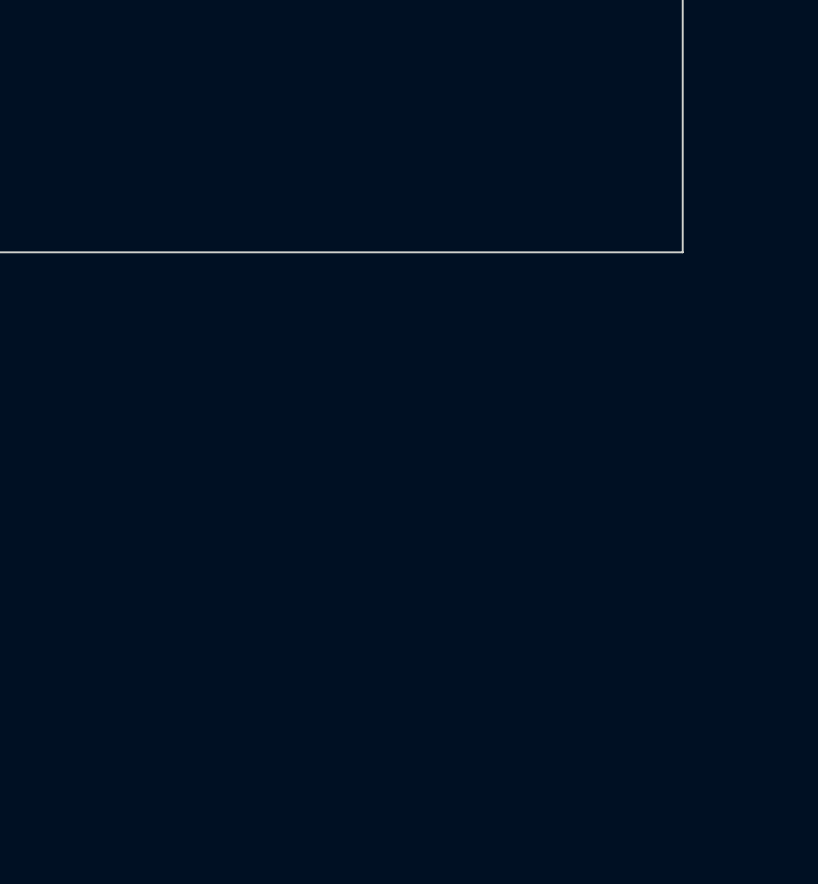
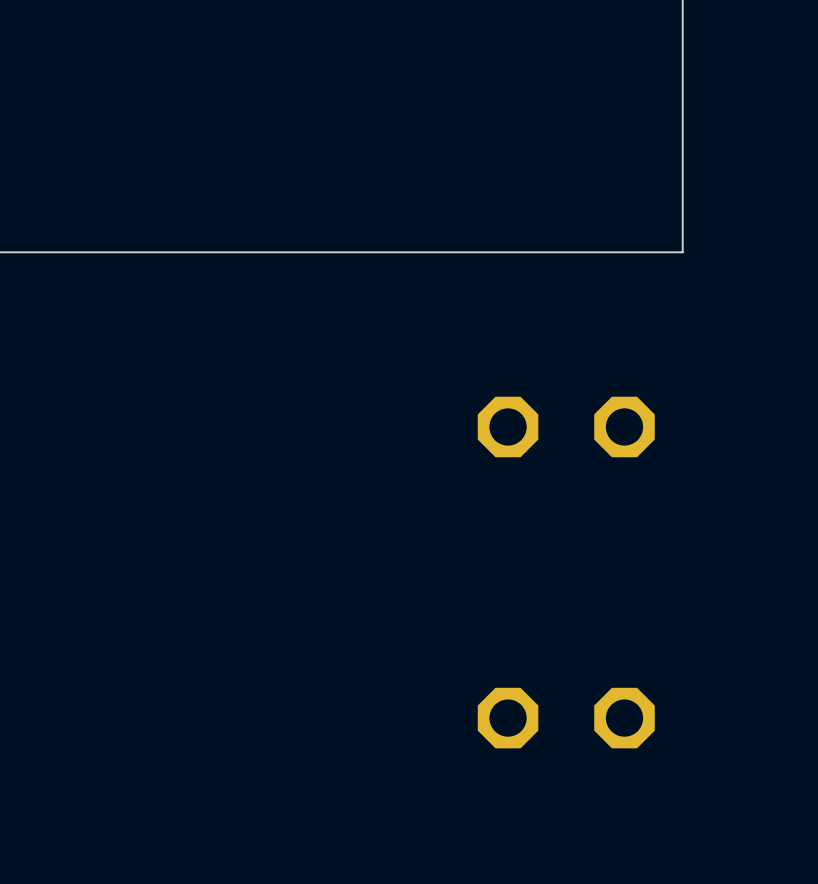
part: none -> (566, 426)
part: none -> (566, 718)

